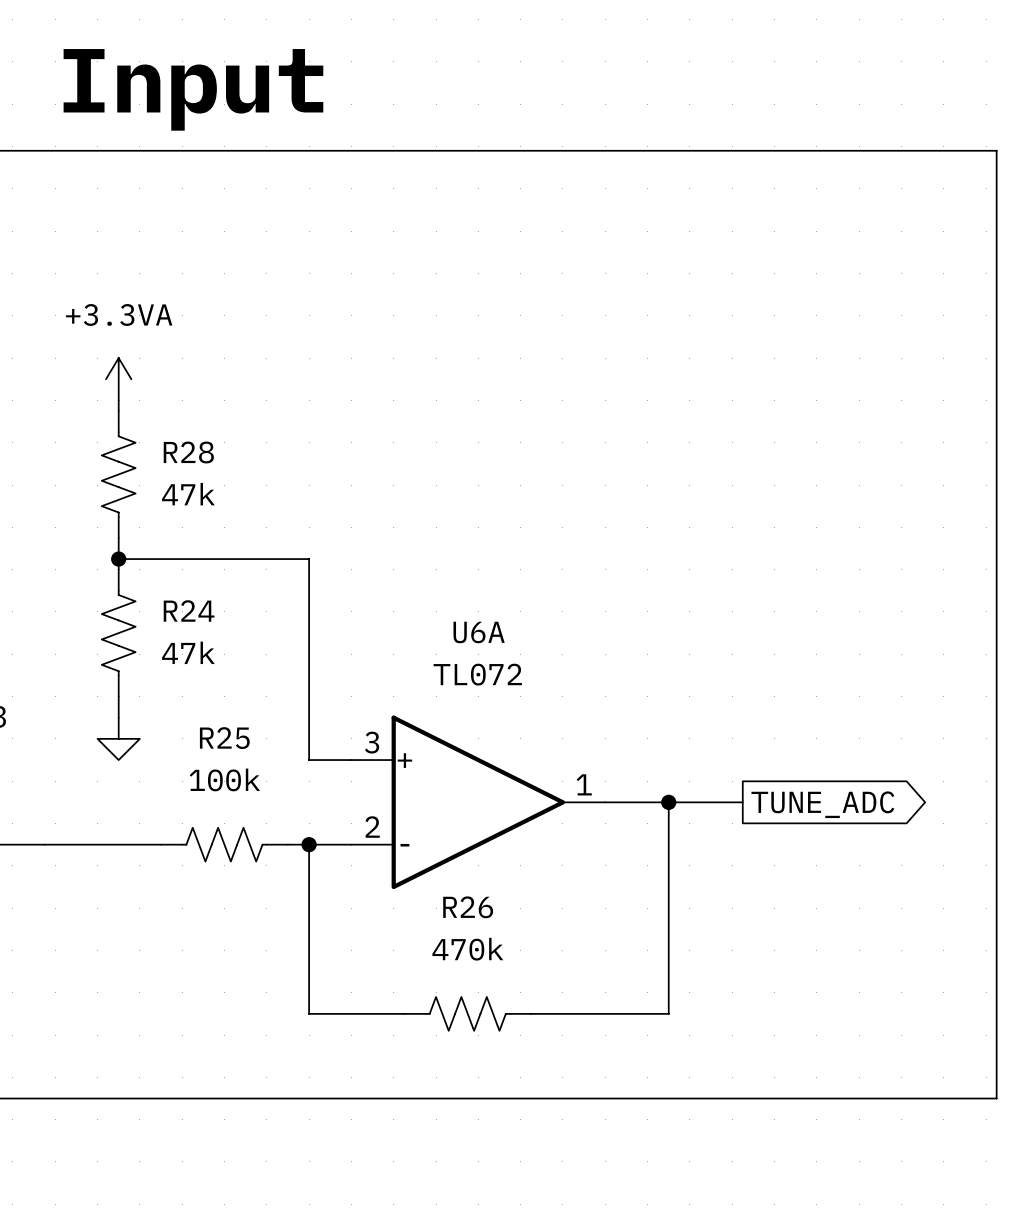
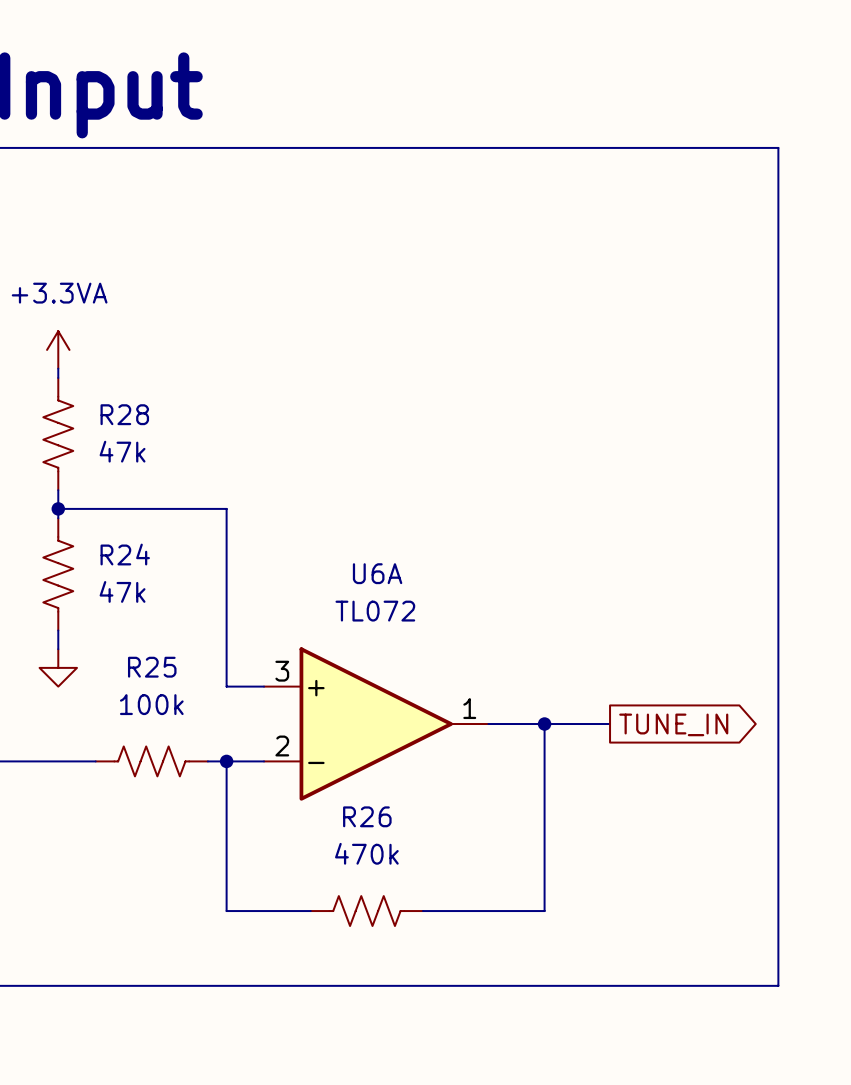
line: (933, 150) (996, 150) (996, 1098) (933, 1098) -> (778, 147) (778, 985)
global label: TUNE_ADC (822, 804) -> TUNE_IN (673, 724)

